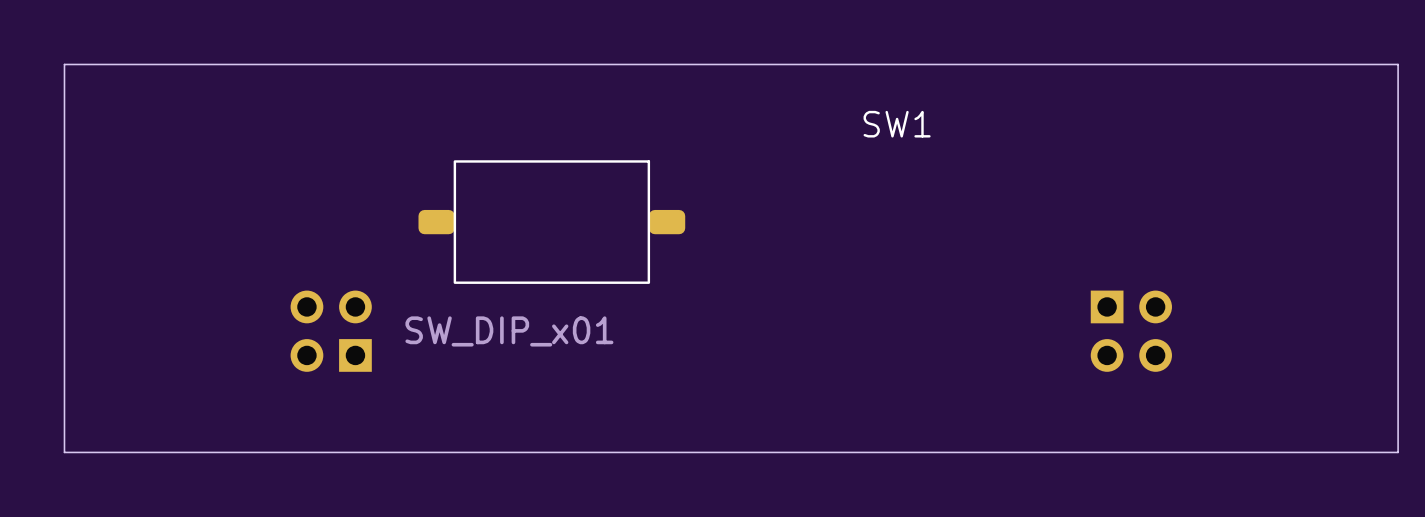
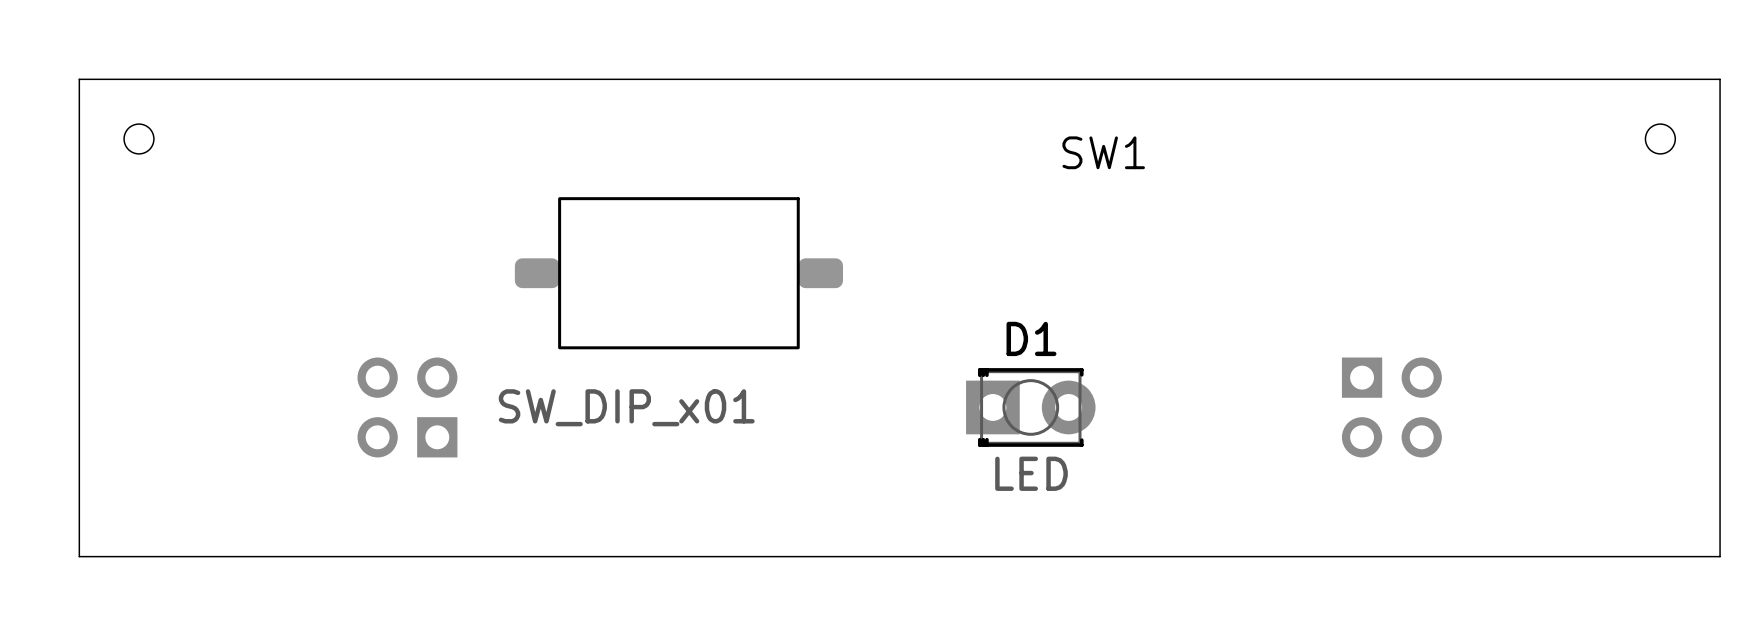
round board edge: none -> [123, 123, 155, 155]
round board edge: none -> [1644, 123, 1677, 155]
D1: none -> LED (1030, 407)

